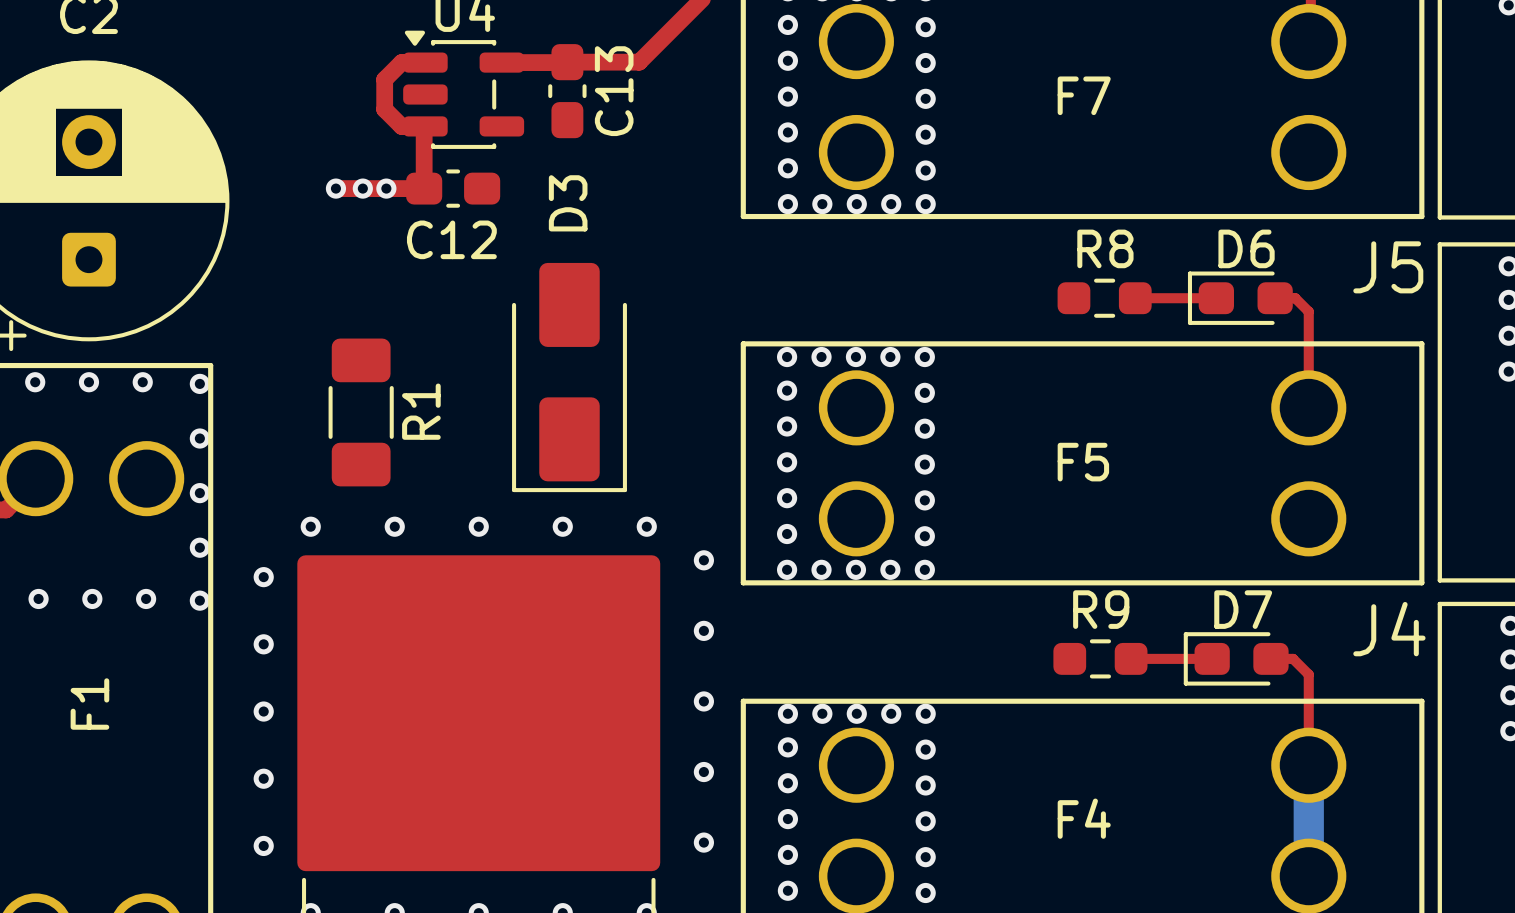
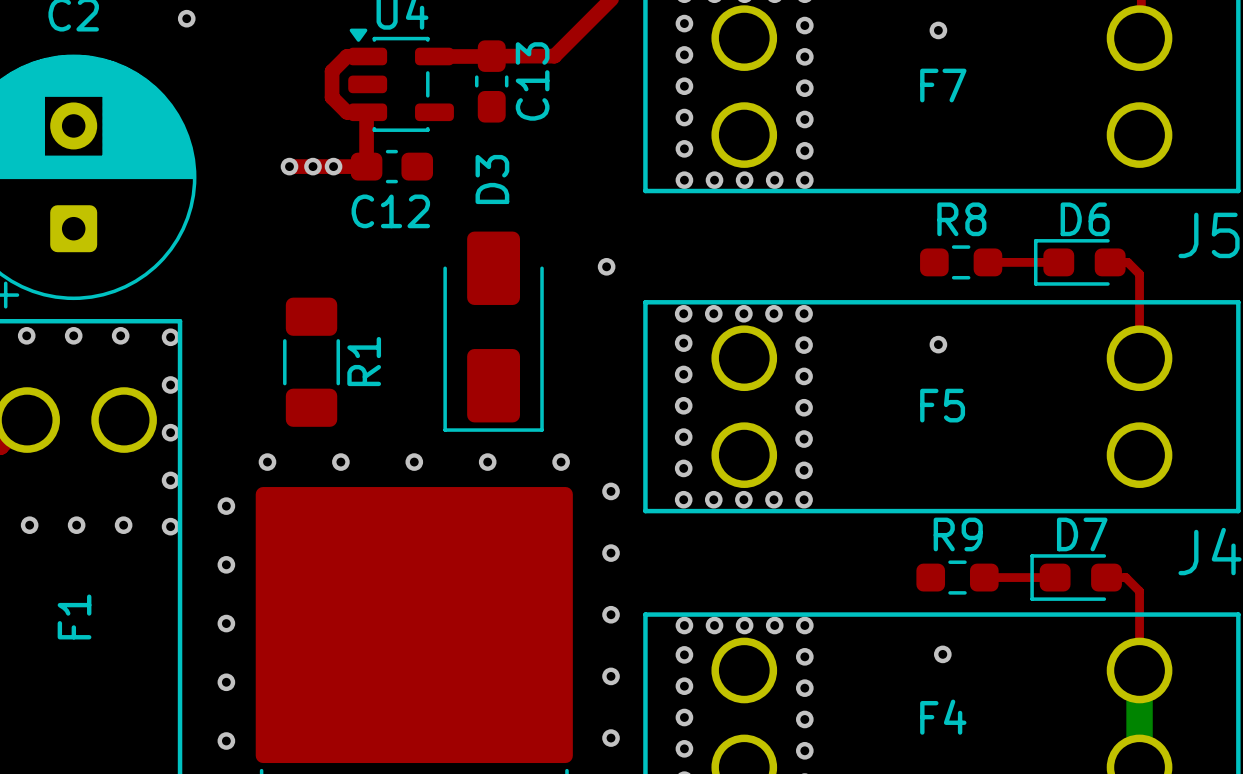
via: none -> (186, 18)
via: none -> (938, 30)
via: none -> (606, 266)
via: none -> (938, 344)
via: none -> (942, 654)

